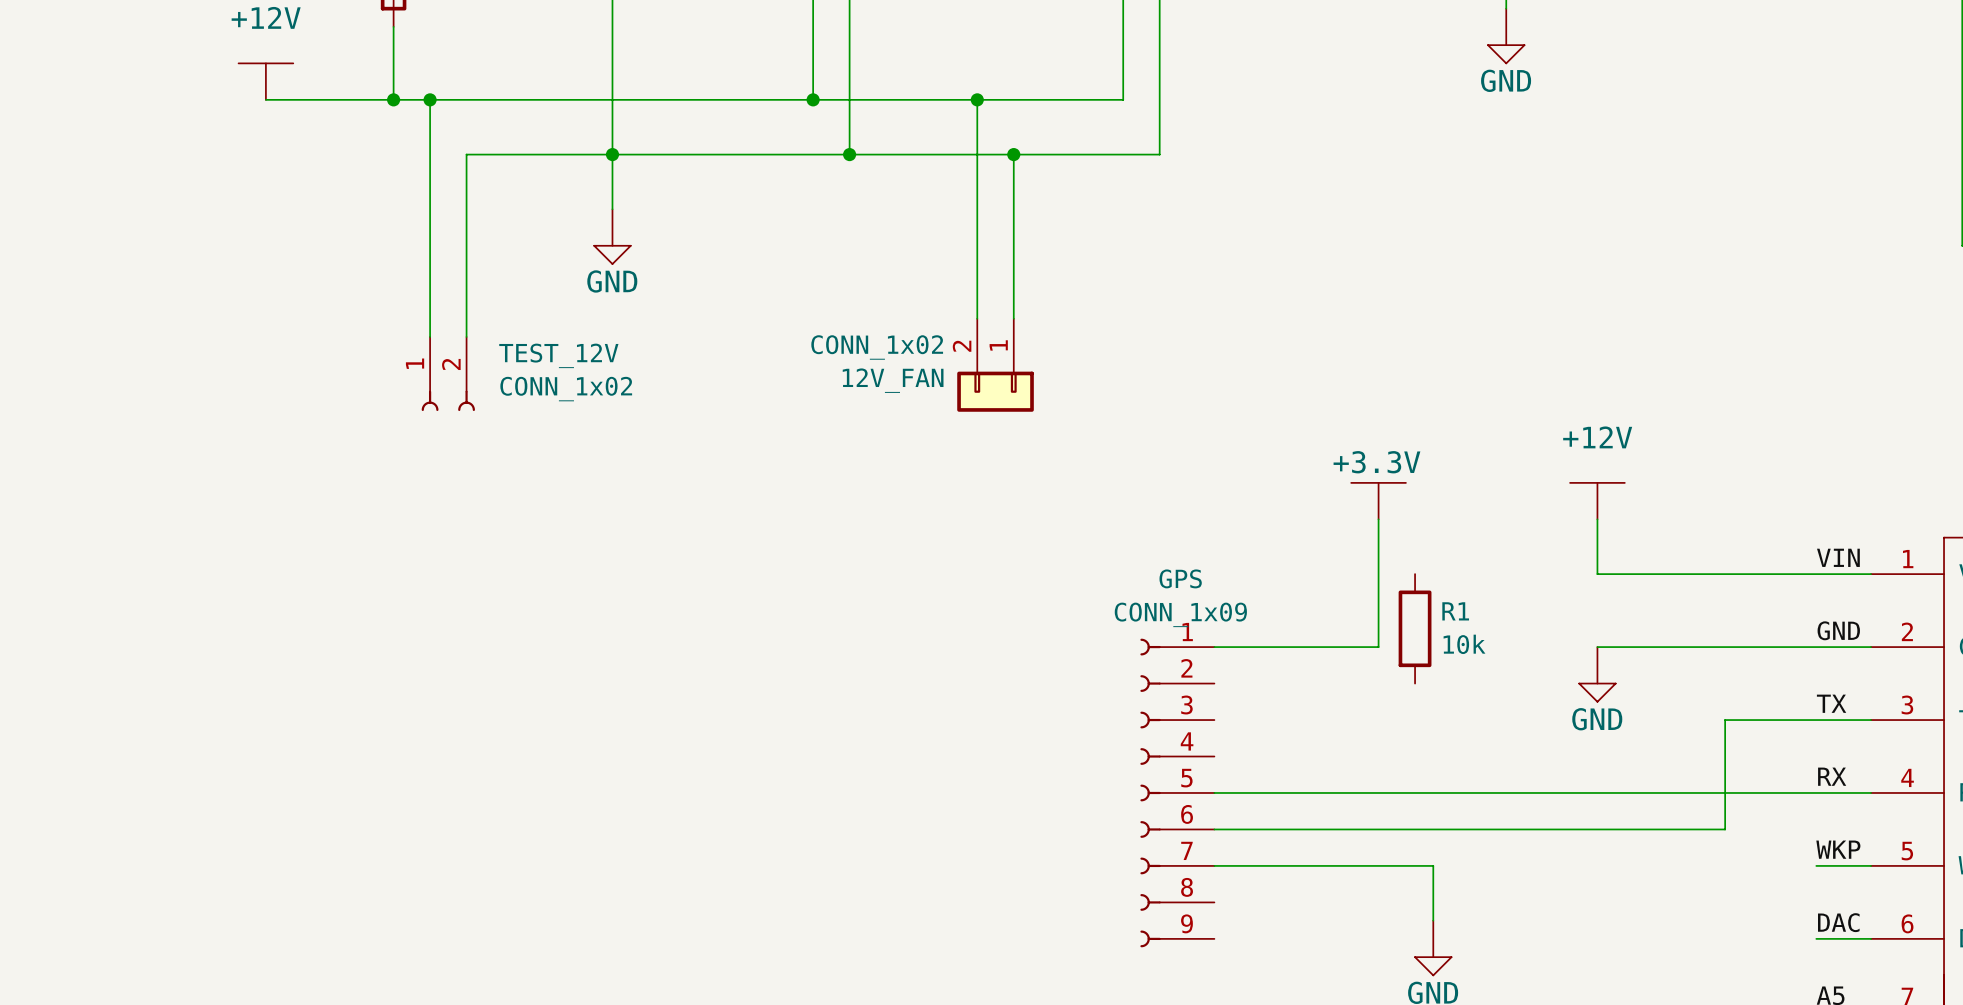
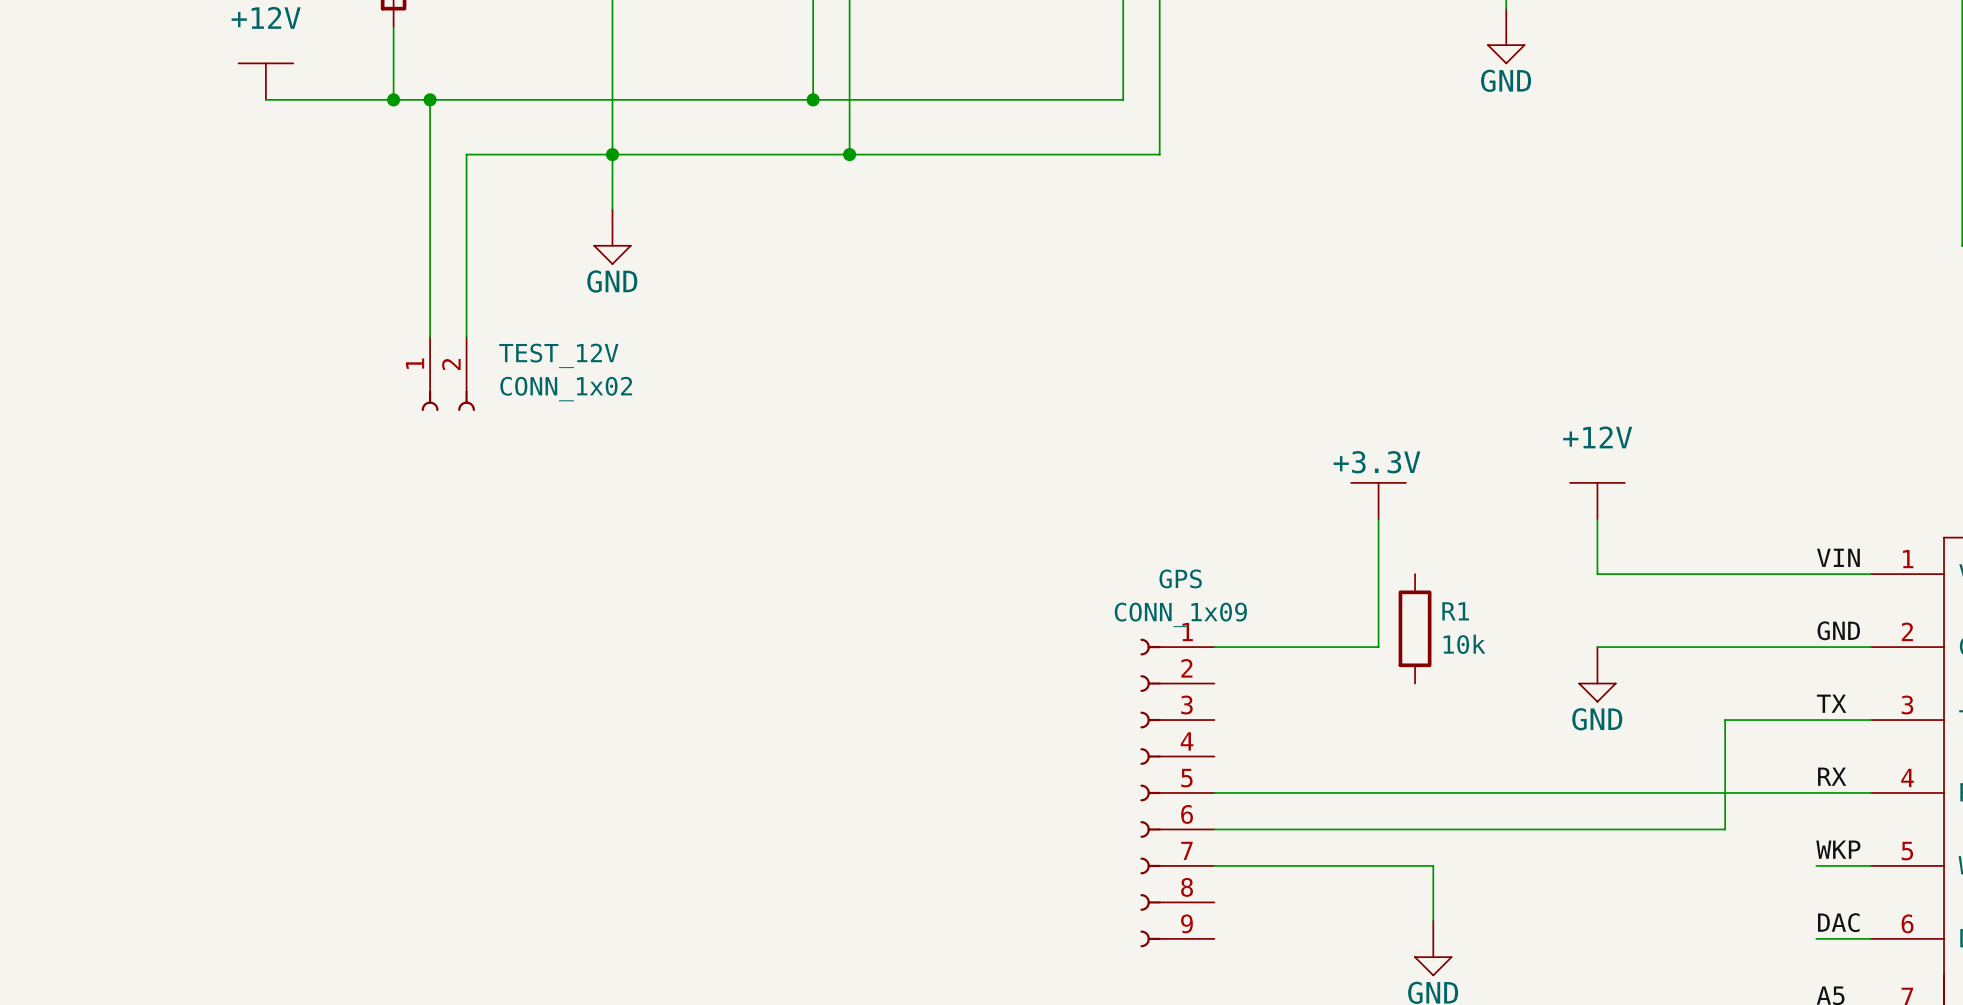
wire: (977, 99) (977, 318) -> none
junction: (977, 99) -> none
wire: (1013, 154) (1013, 318) -> none
junction: (1013, 154) -> none
12V_FAN: CONN_1x02 (995, 365) -> none

